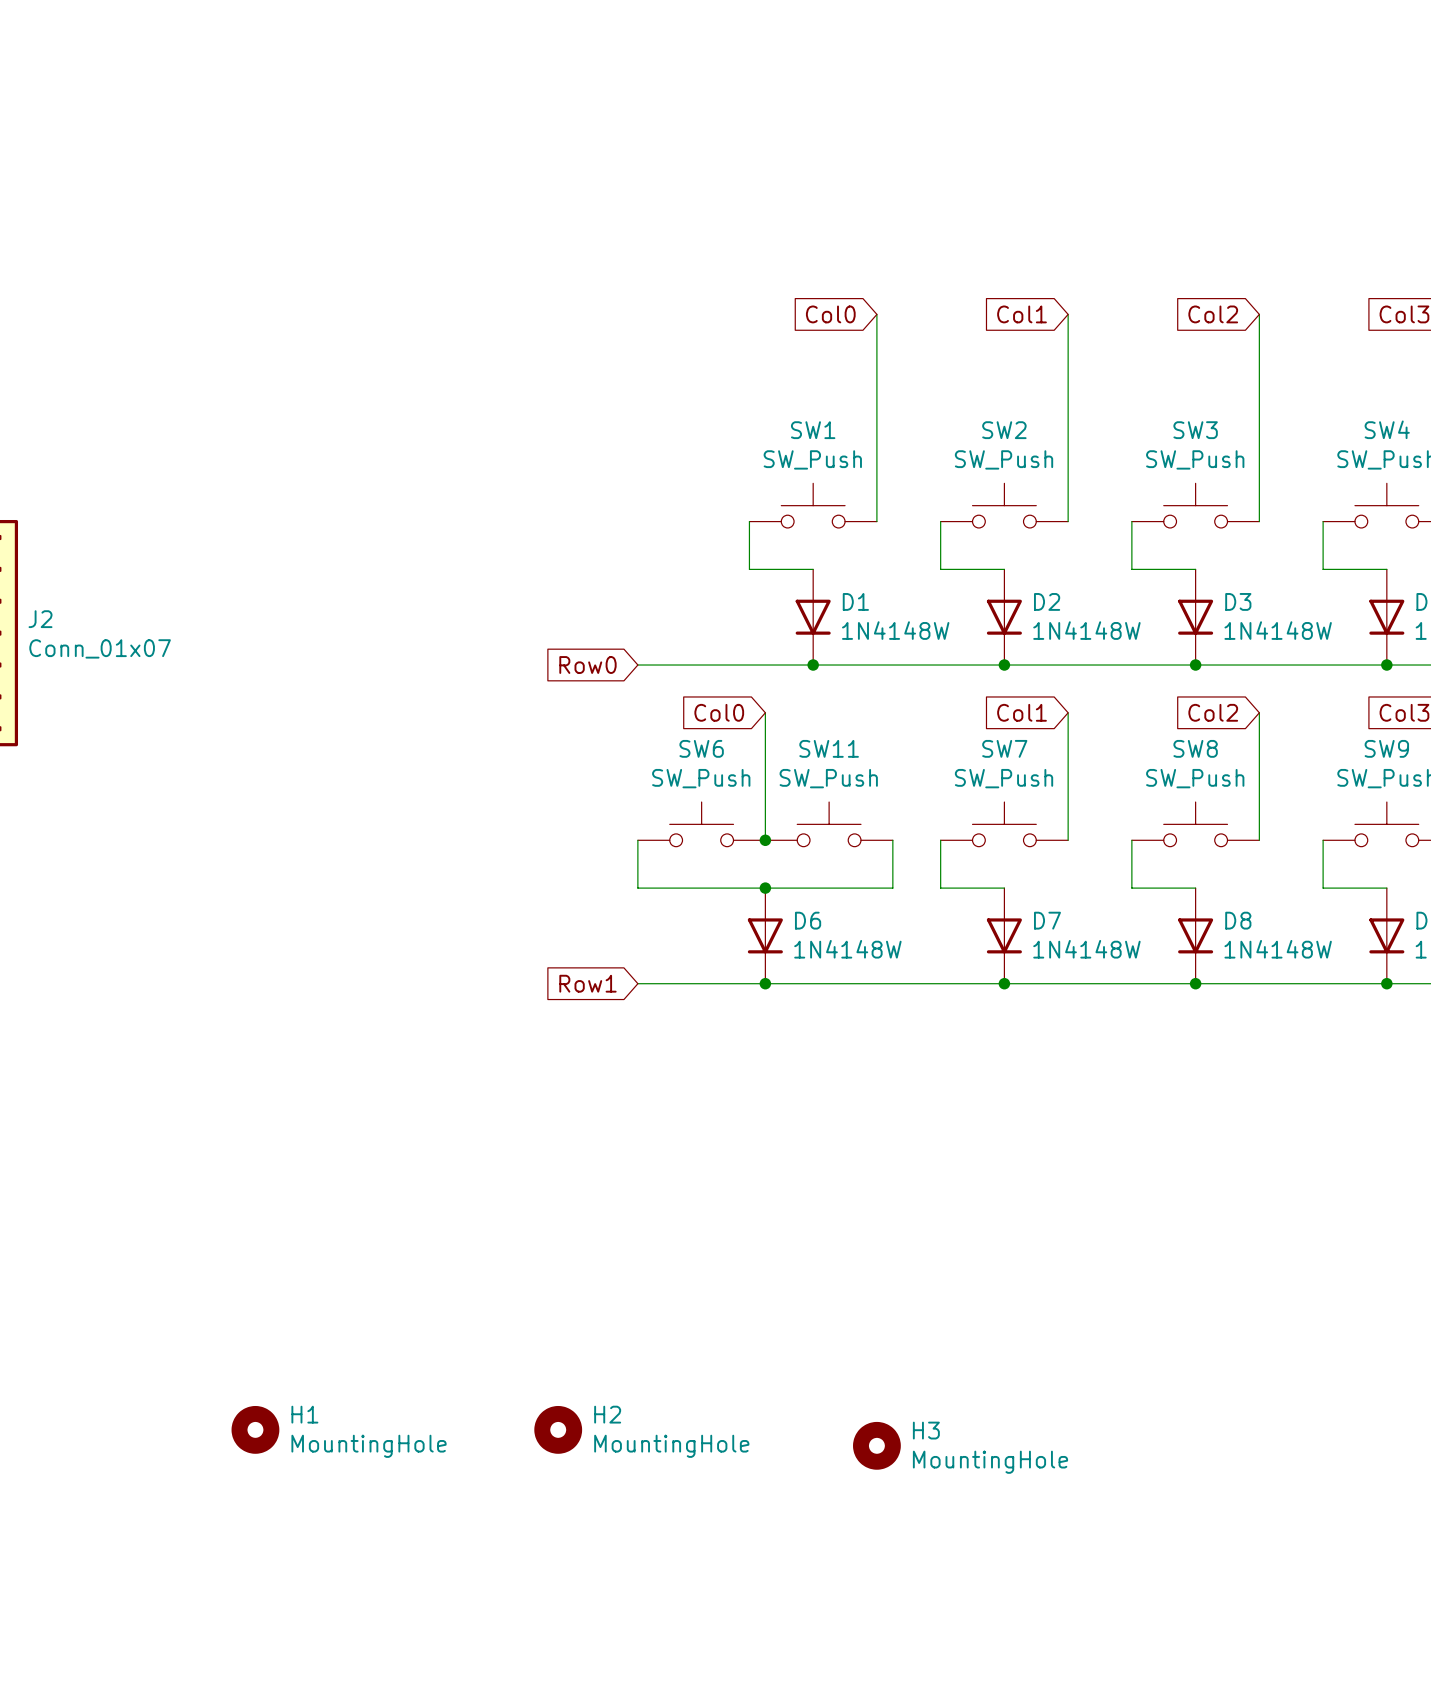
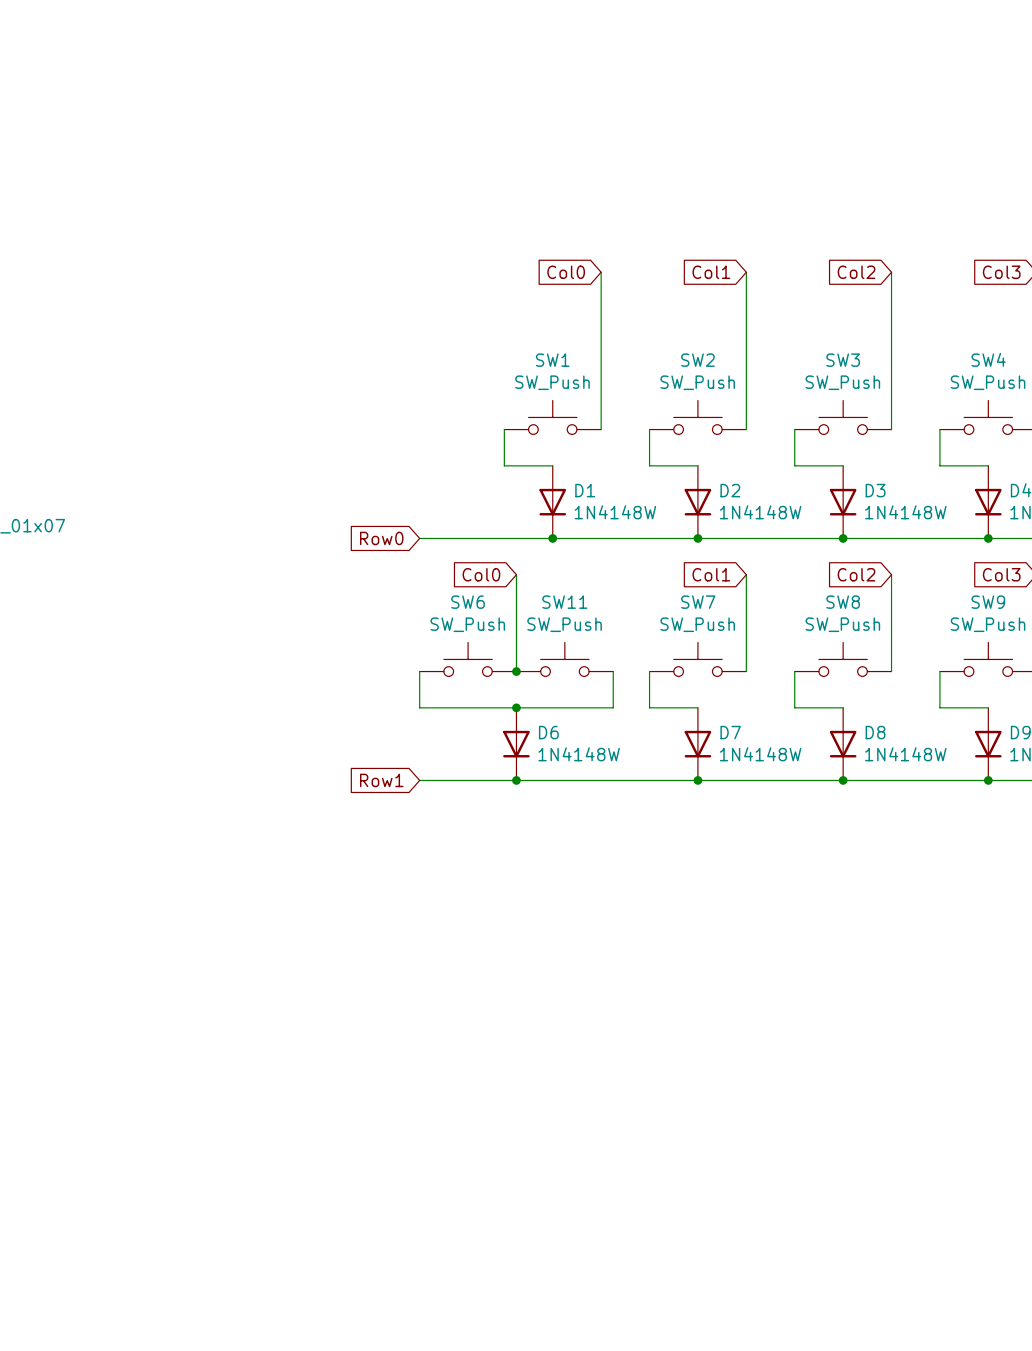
H1: MountingHole (255, 1429) -> none
H2: MountingHole (558, 1429) -> none
H3: MountingHole (876, 1445) -> none

